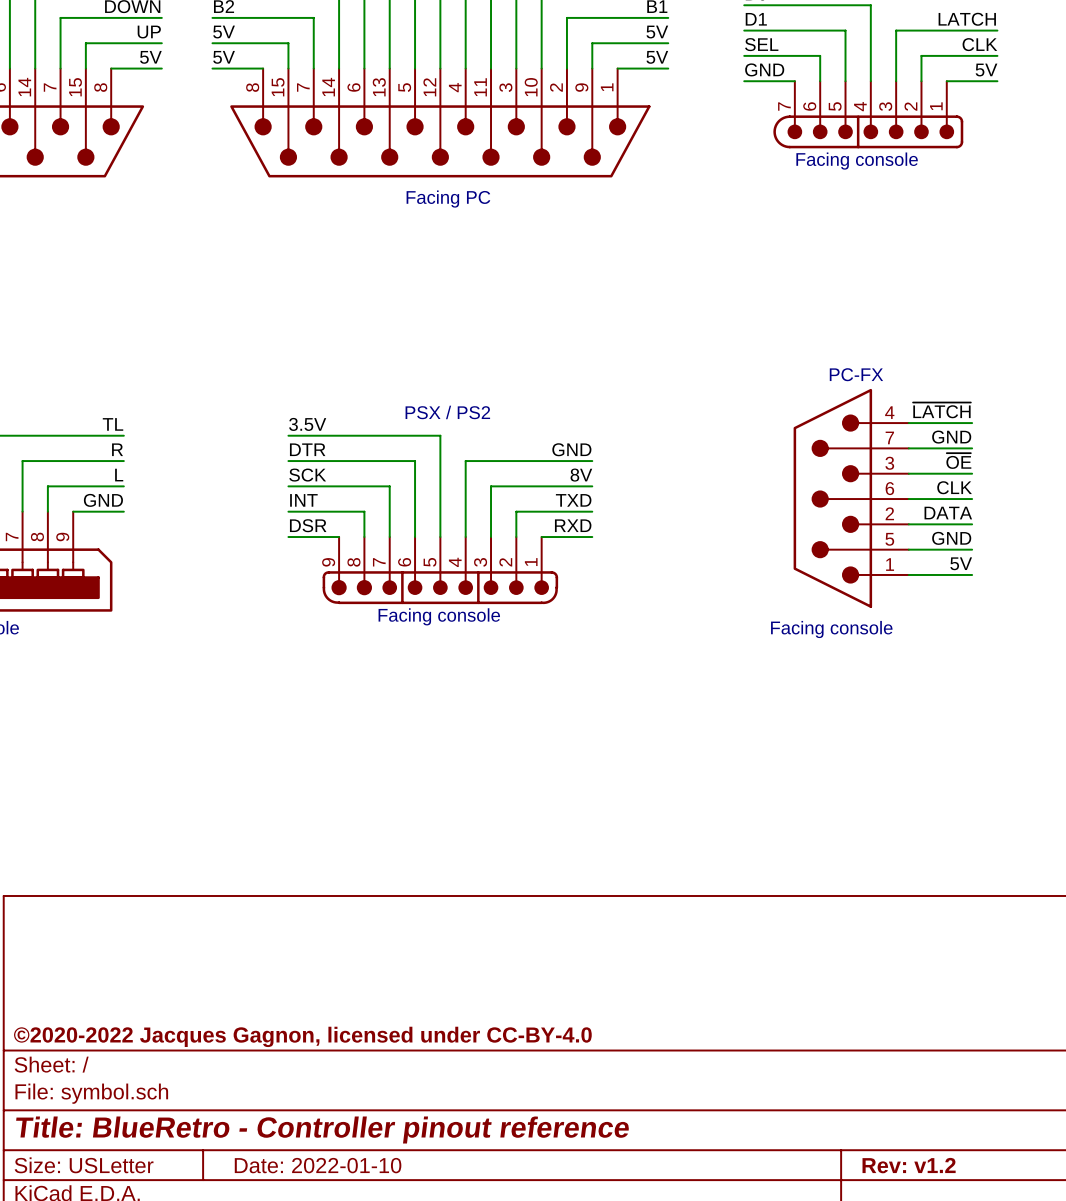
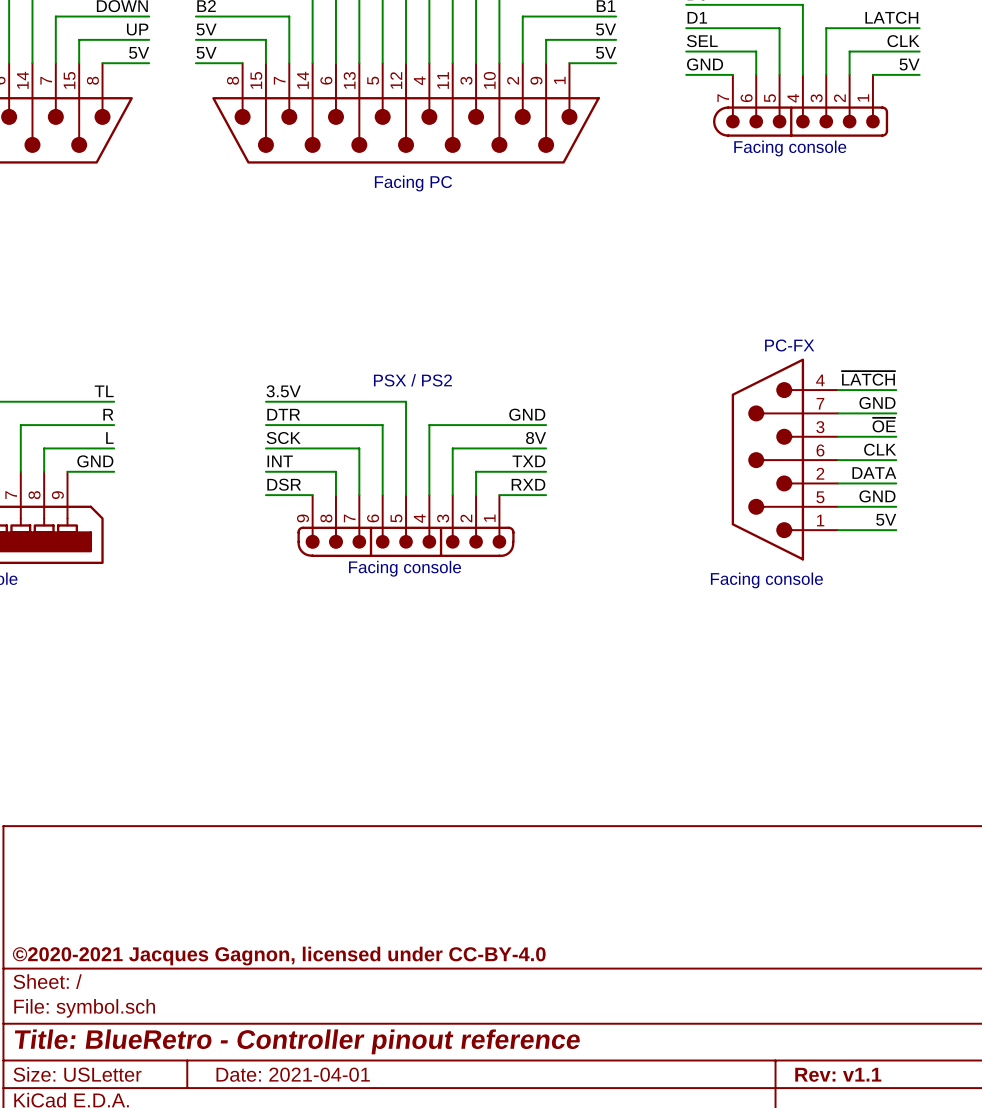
title block: ©2020-2022 Jacques Gagnon, licensed under CC-BY-4.0 (302, 1036) -> ©2020-2021 Jacques Gagnon, licensed under CC-BY-4.0 (279, 956)
title block: Date: 2022-01-10 (318, 1165) -> Date: 2021-04-01 (293, 1074)
title block: Rev: v1.2 (909, 1165) -> Rev: v1.1 (838, 1074)

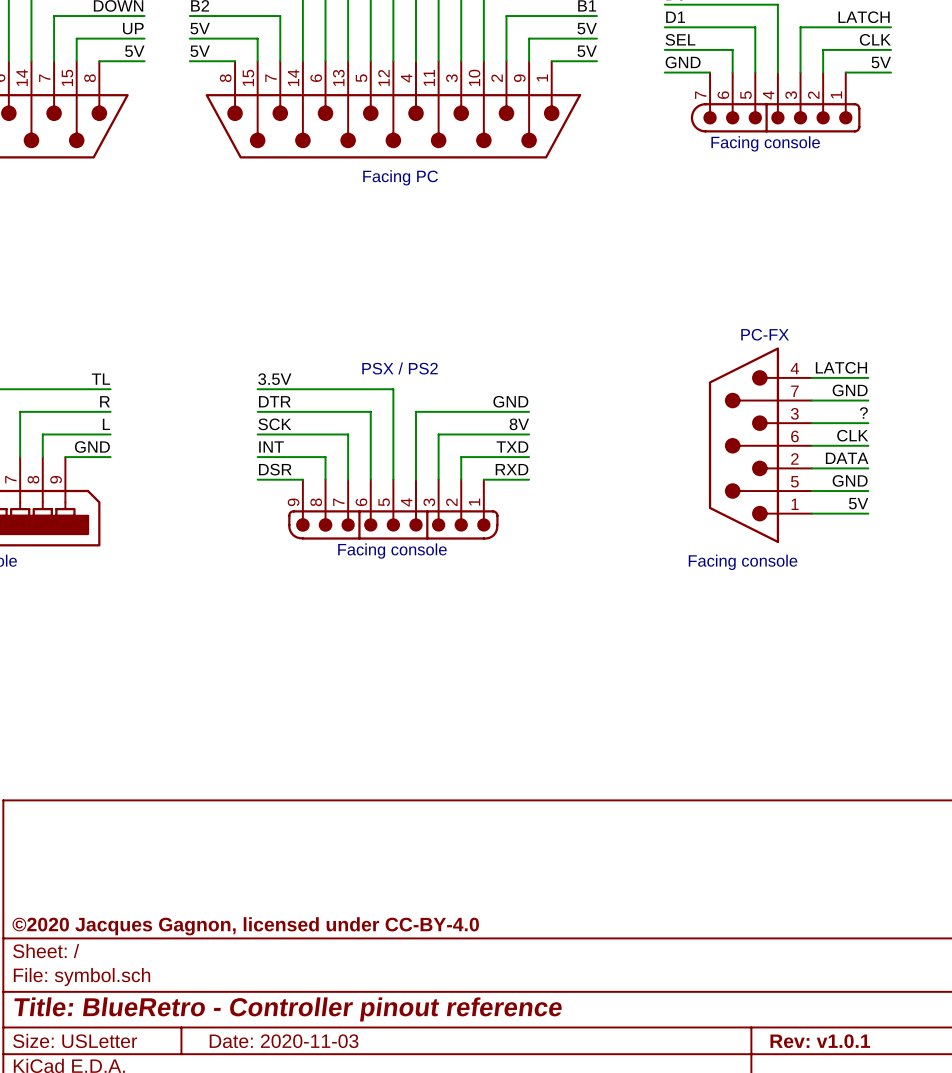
label: ~{LATCH} (868, 378) -> LATCH (841, 367)
label: ~{OE} (884, 425) -> ? (863, 412)
title block: ©2020-2021 Jacques Gagnon, licensed under CC-BY-4.0 (279, 956) -> ©2020 Jacques Gagnon, licensed under CC-BY-4.0 (245, 926)
title block: Date: 2021-04-01 (293, 1074) -> Date: 2020-11-03 (284, 1041)
title block: Rev: v1.1 (838, 1074) -> Rev: v1.0.1 (820, 1041)

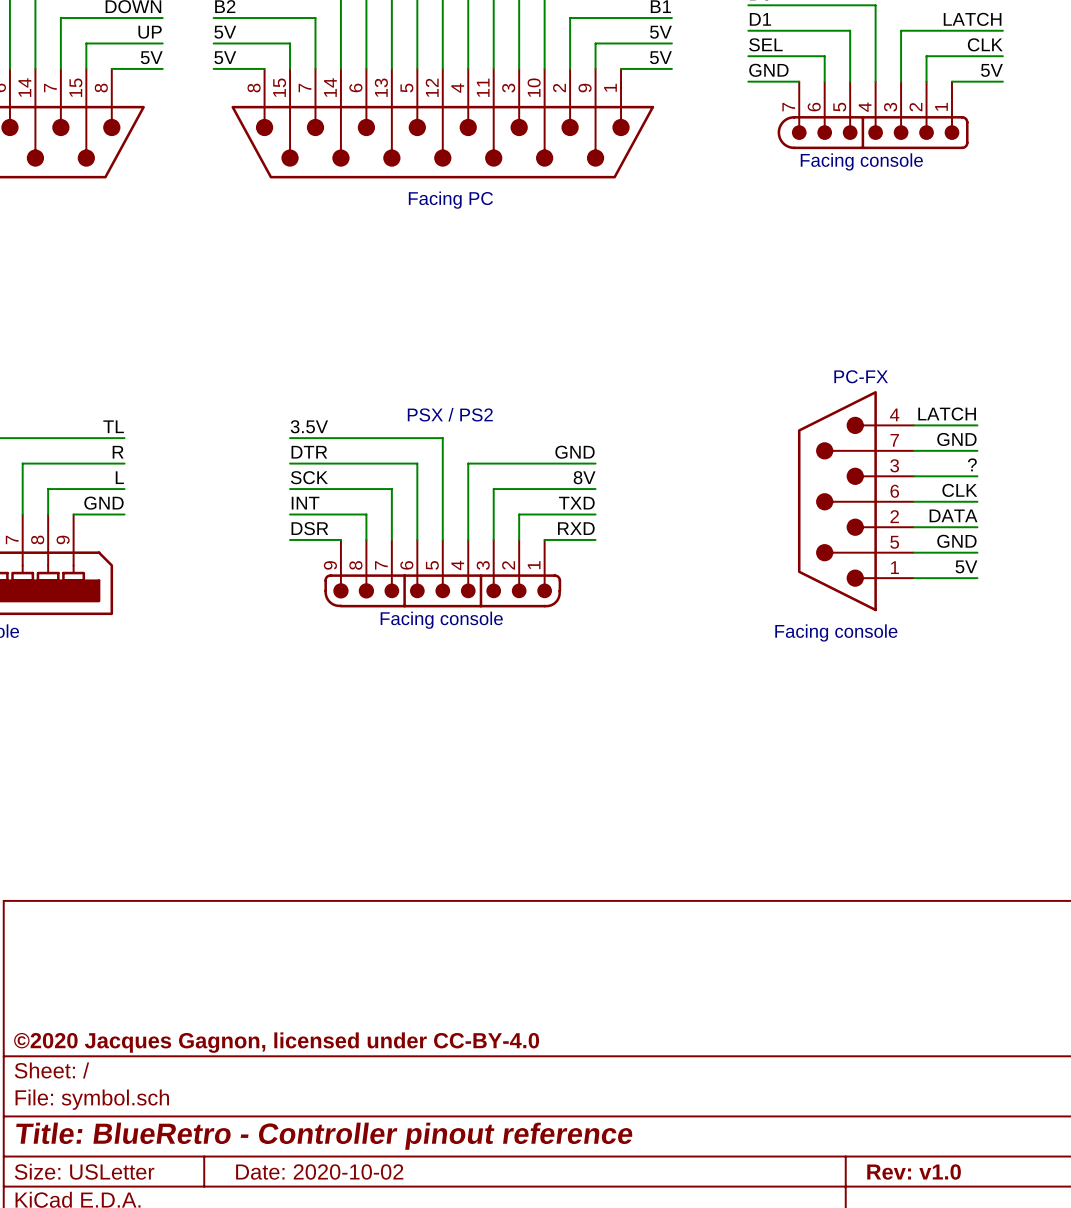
title block: Date: 2020-11-03 (284, 1041) -> Date: 2020-10-02 (319, 1171)
title block: Rev: v1.0.1 (820, 1041) -> Rev: v1.0 (914, 1171)

